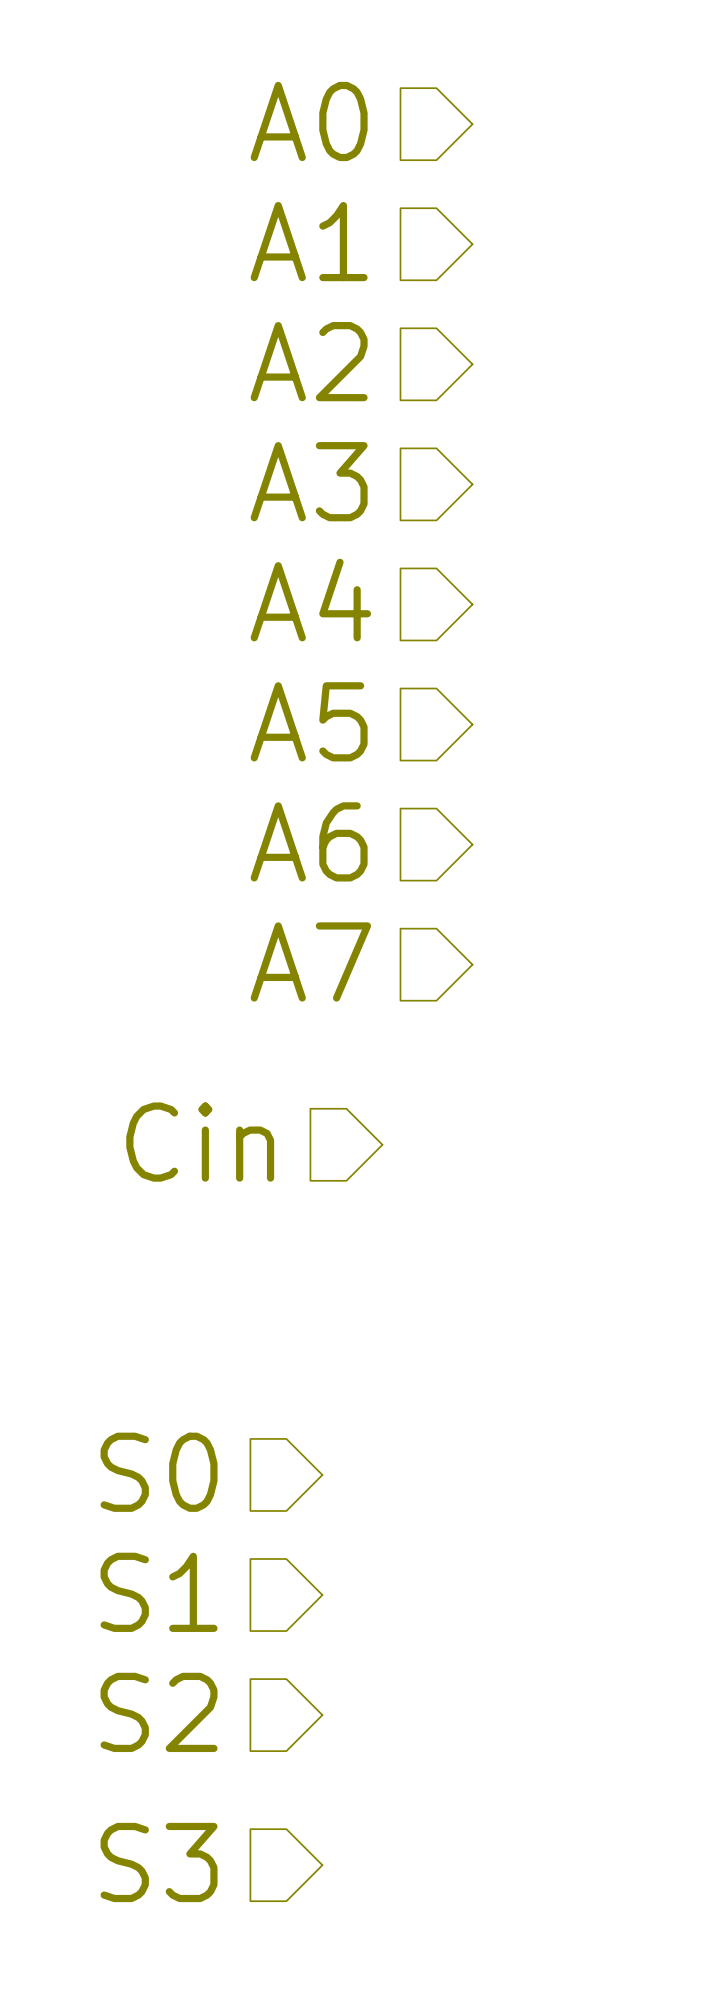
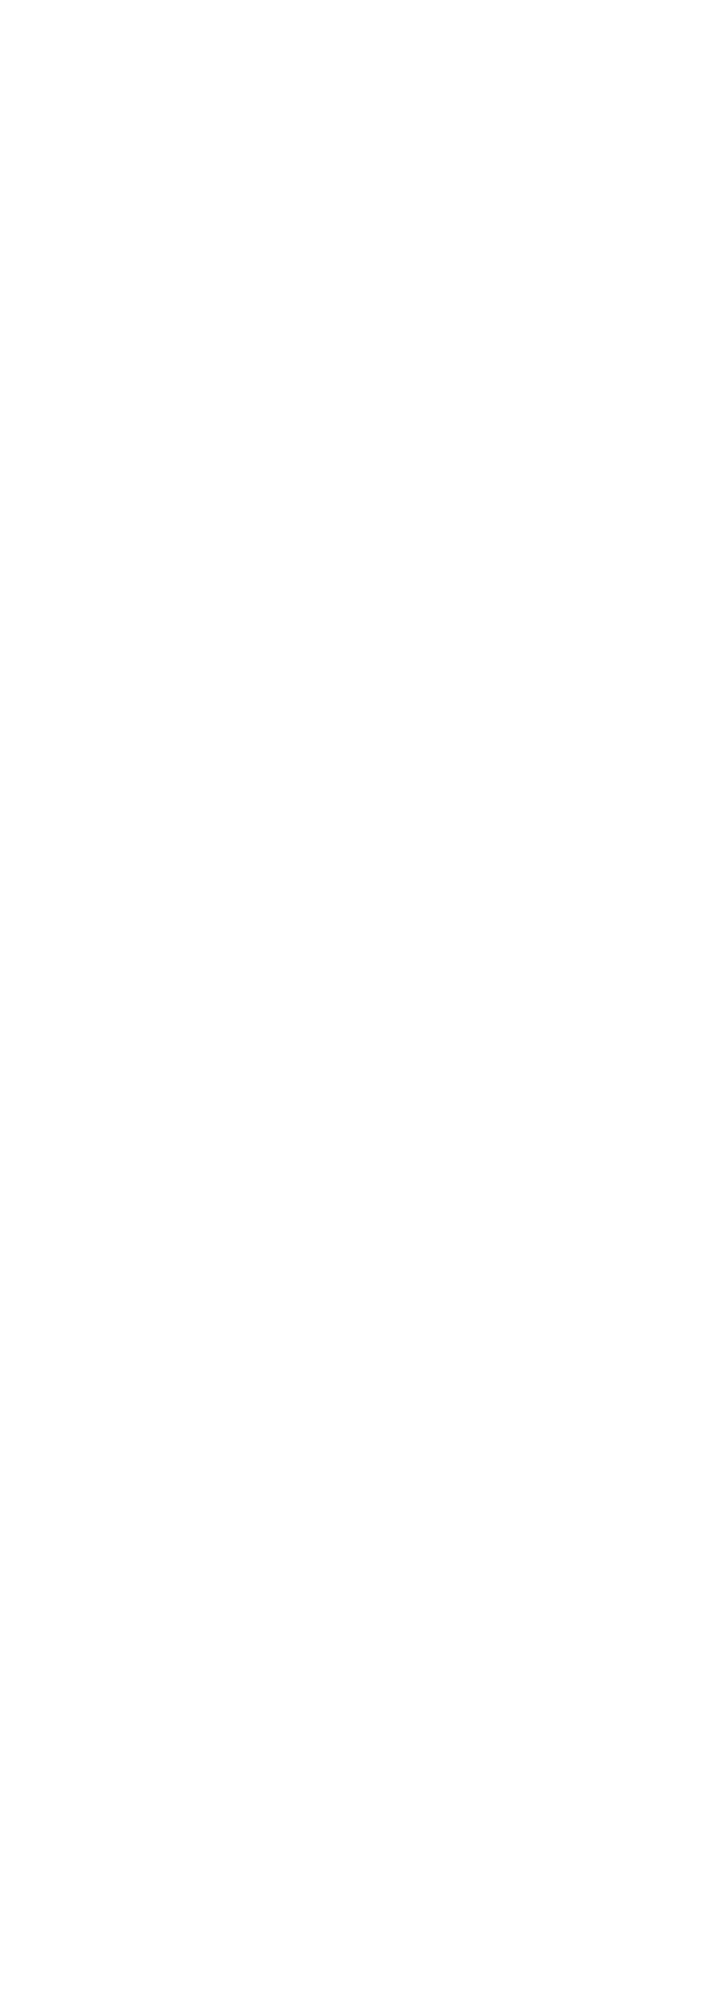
hierarchical label: A0 (309, 121) -> none
hierarchical label: A1 (309, 241) -> none
hierarchical label: A2 (309, 361) -> none
hierarchical label: A3 (309, 481) -> none
hierarchical label: A4 (310, 600) -> none
hierarchical label: A5 (309, 721) -> none
hierarchical label: A6 (309, 841) -> none
hierarchical label: A7 (310, 961) -> none
hierarchical label: Cin (200, 1142) -> none
hierarchical label: S0 (159, 1472) -> none
hierarchical label: S1 (159, 1592) -> none
hierarchical label: S2 (159, 1712) -> none
hierarchical label: S3 (159, 1862) -> none

